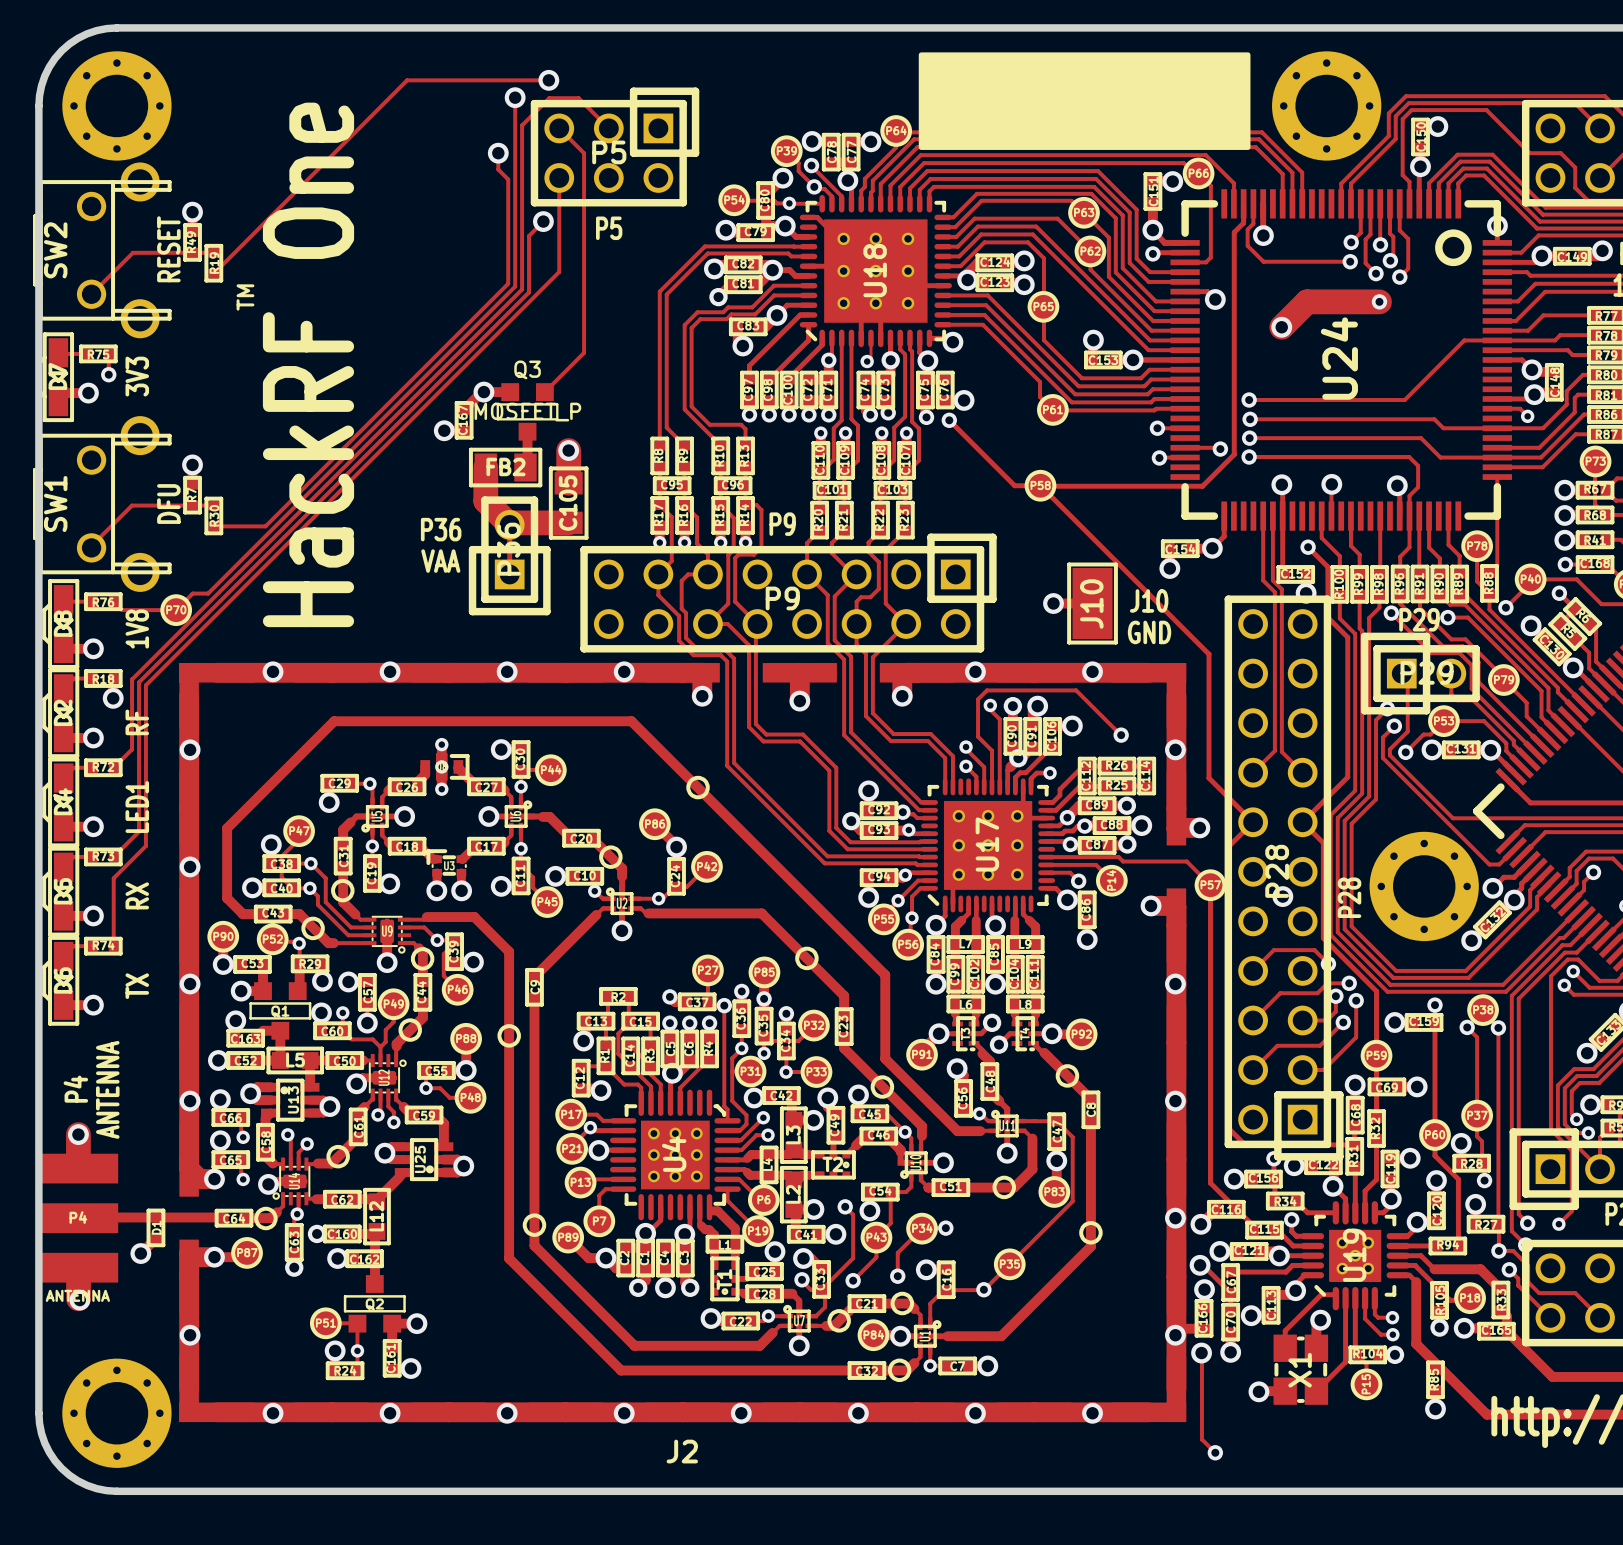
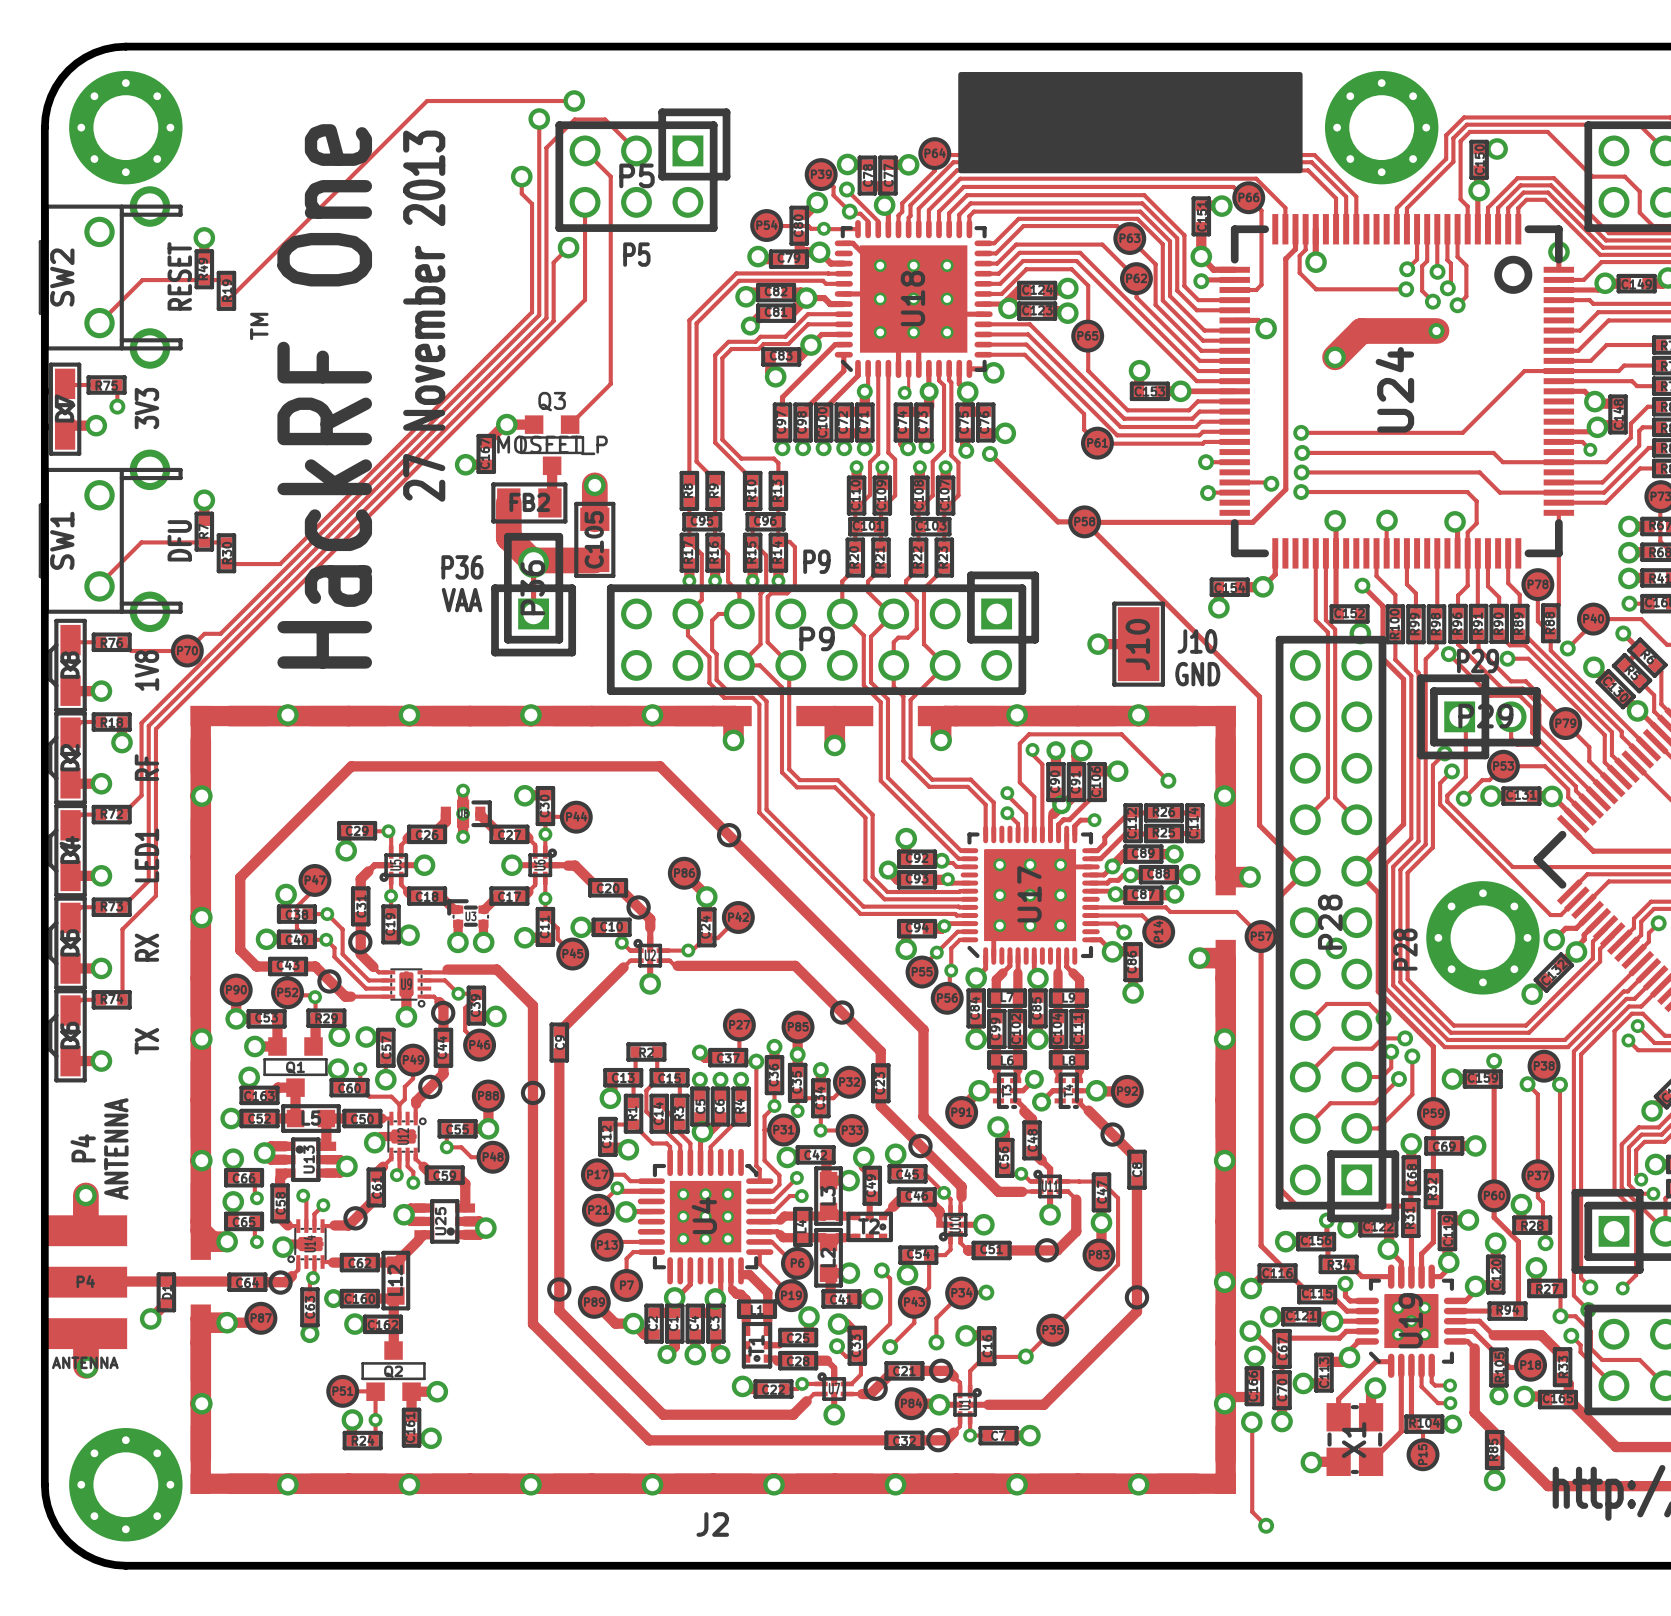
text: none -> 27 November 2013 (424, 316)

